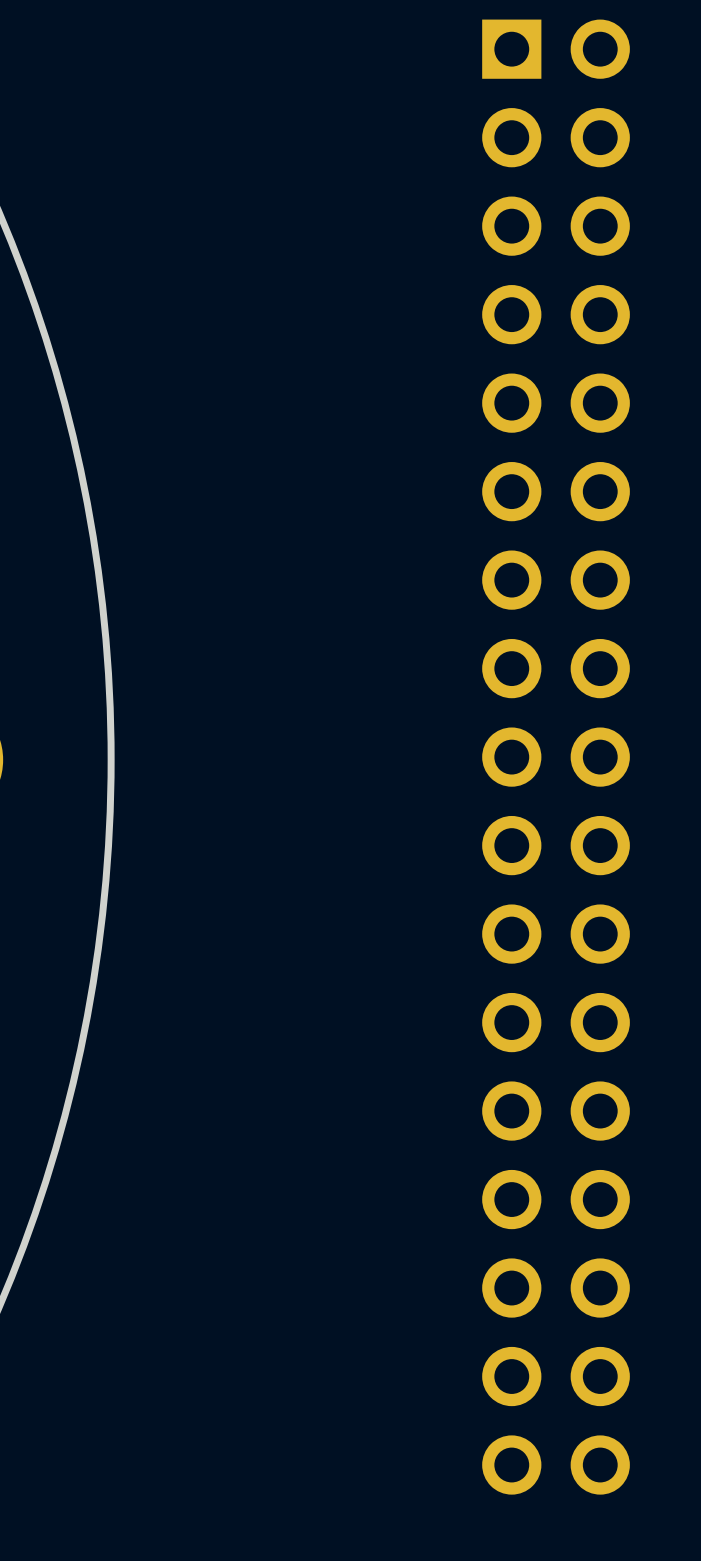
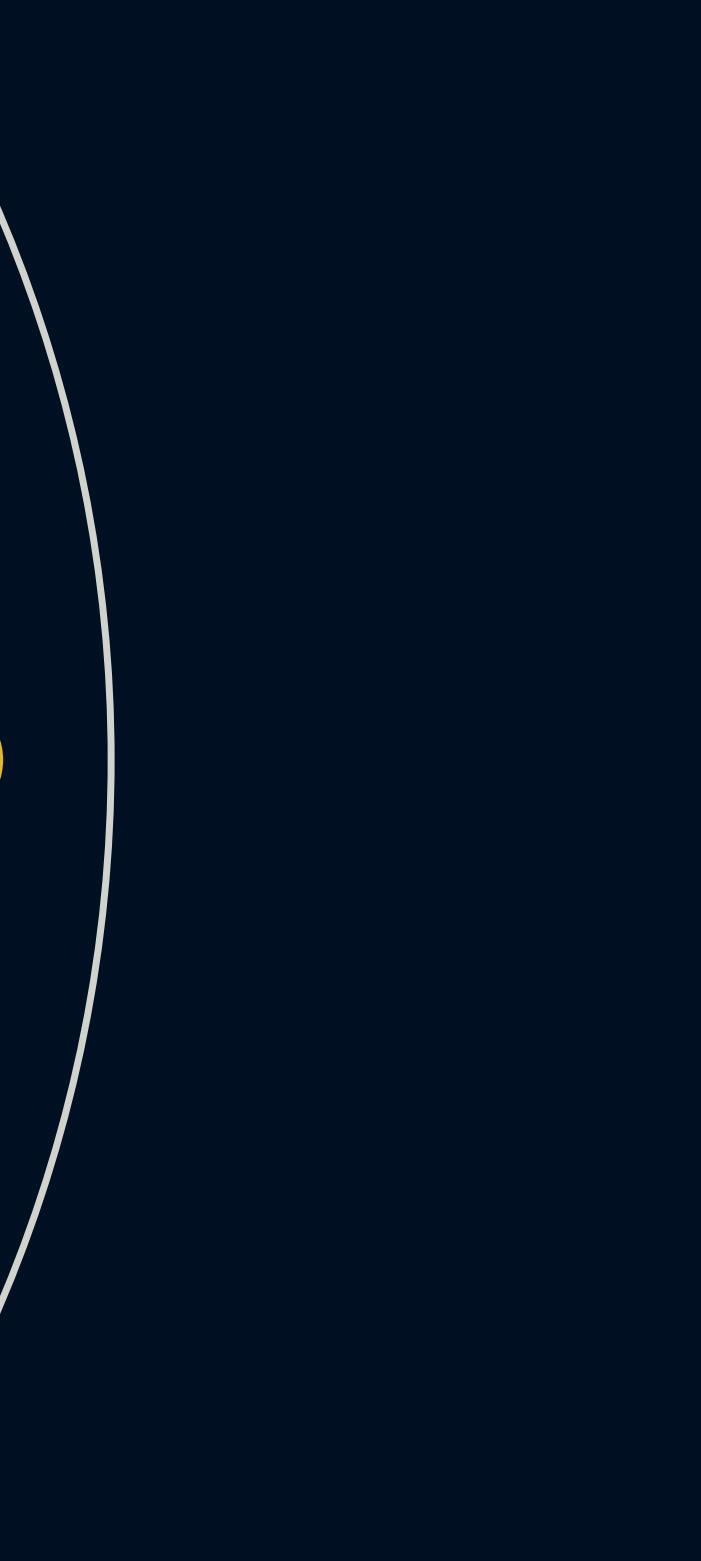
part: (556, 757) -> none

